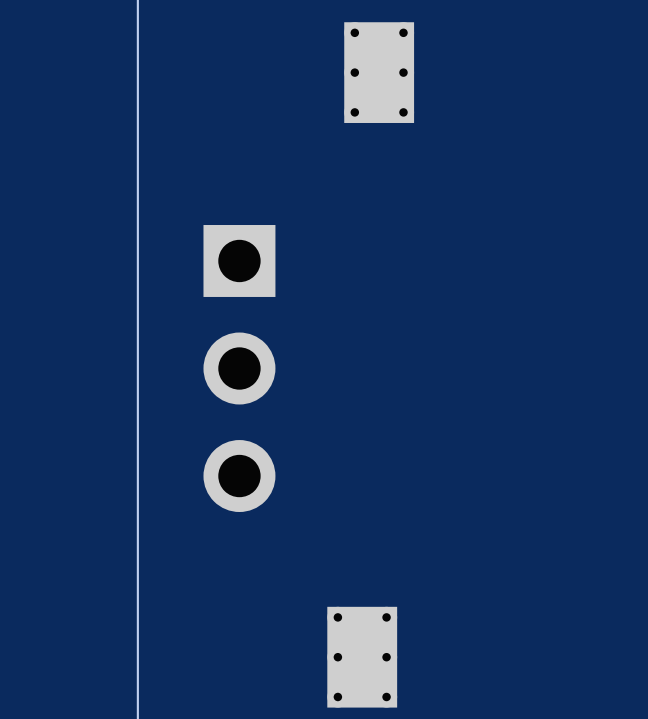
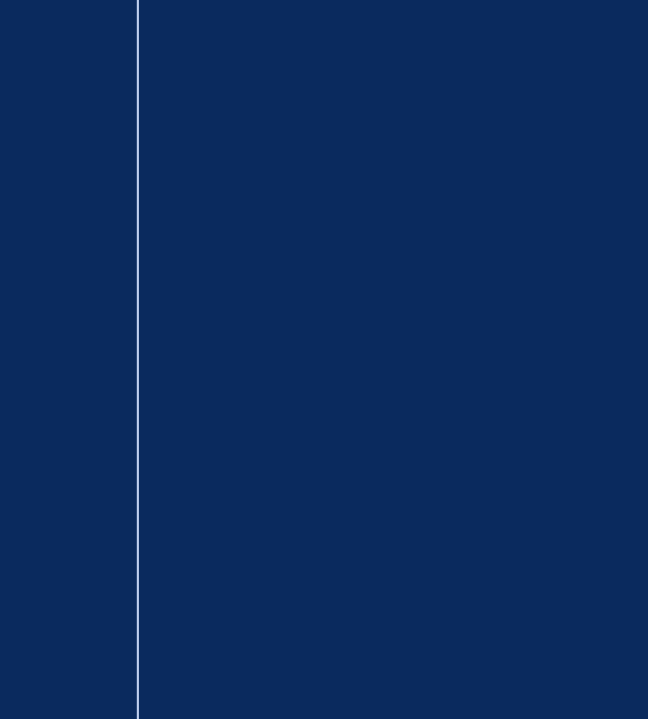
part: (379, 72) -> none
part: (239, 368) -> none
part: (362, 657) -> none

